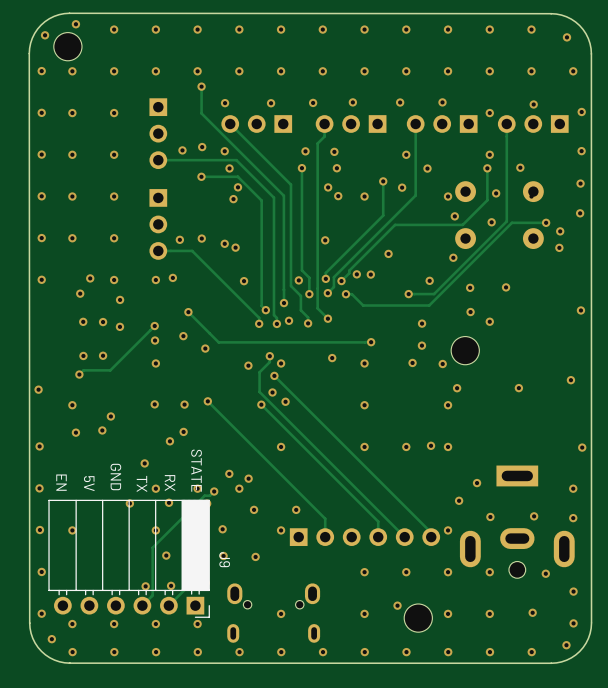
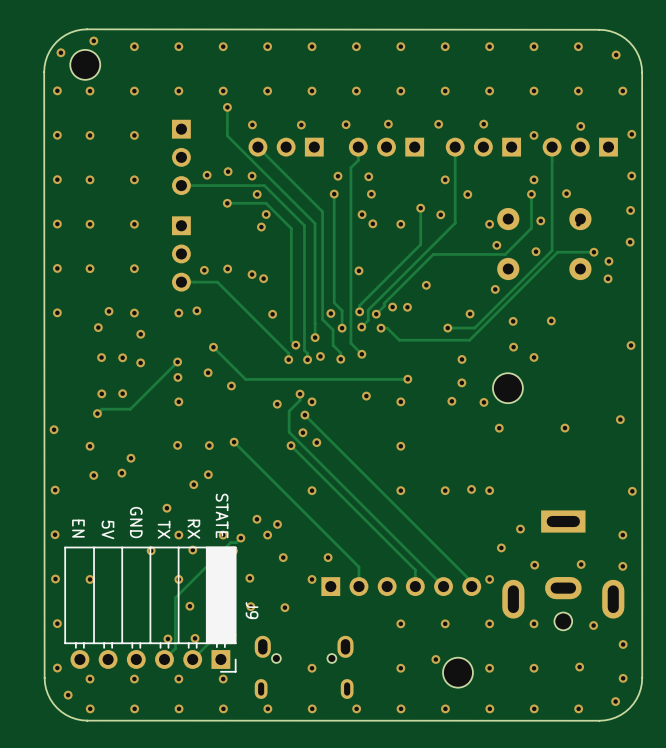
via: (448, 405) -> none

